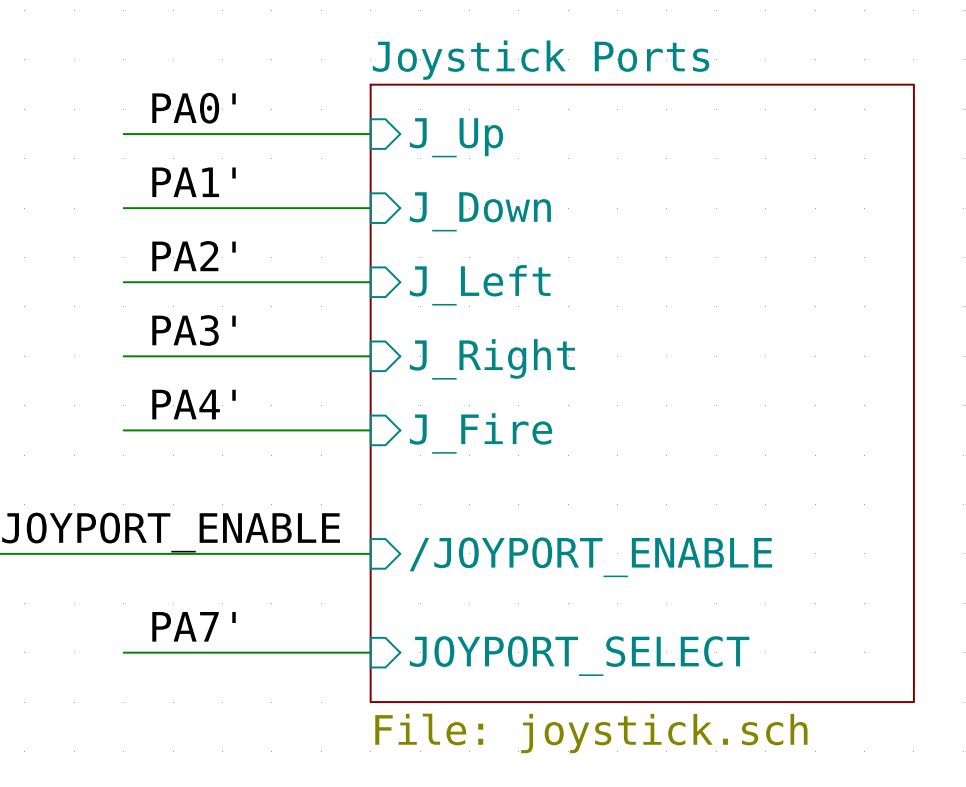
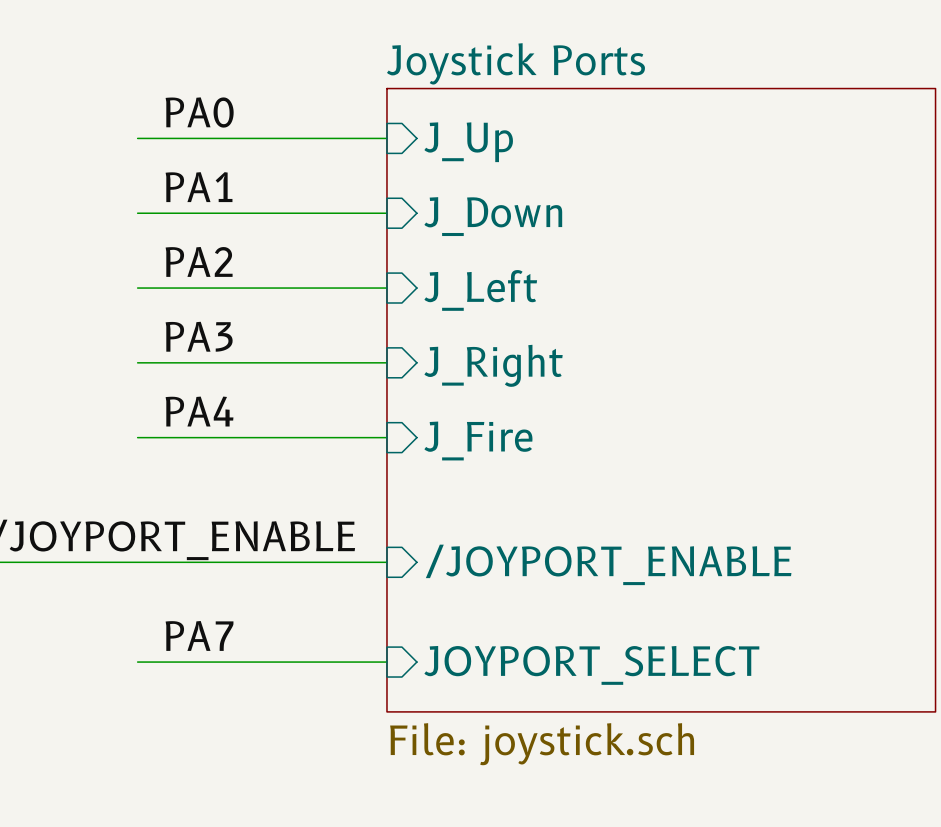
label: PA0' (194, 108) -> PA0 (199, 112)
label: PA1' (194, 182) -> PA1 (199, 187)
label: PA2' (194, 256) -> PA2 (199, 261)
label: PA3' (194, 330) -> PA3 (199, 336)
label: PA4' (194, 404) -> PA4 (199, 411)
label: PA7' (194, 626) -> PA7 (199, 635)

